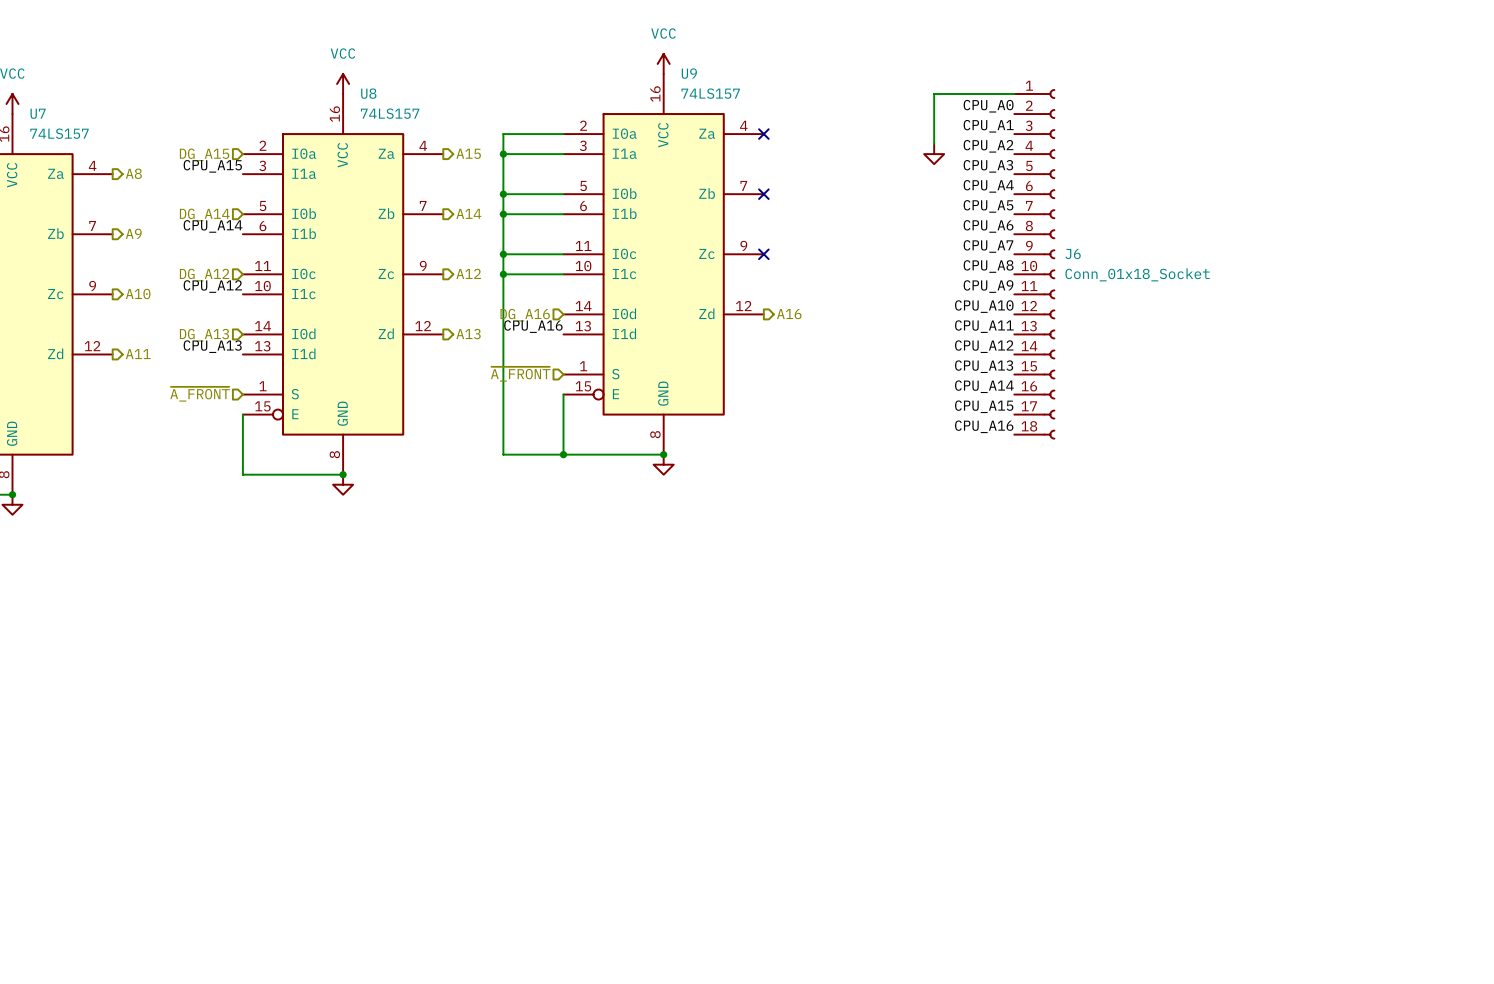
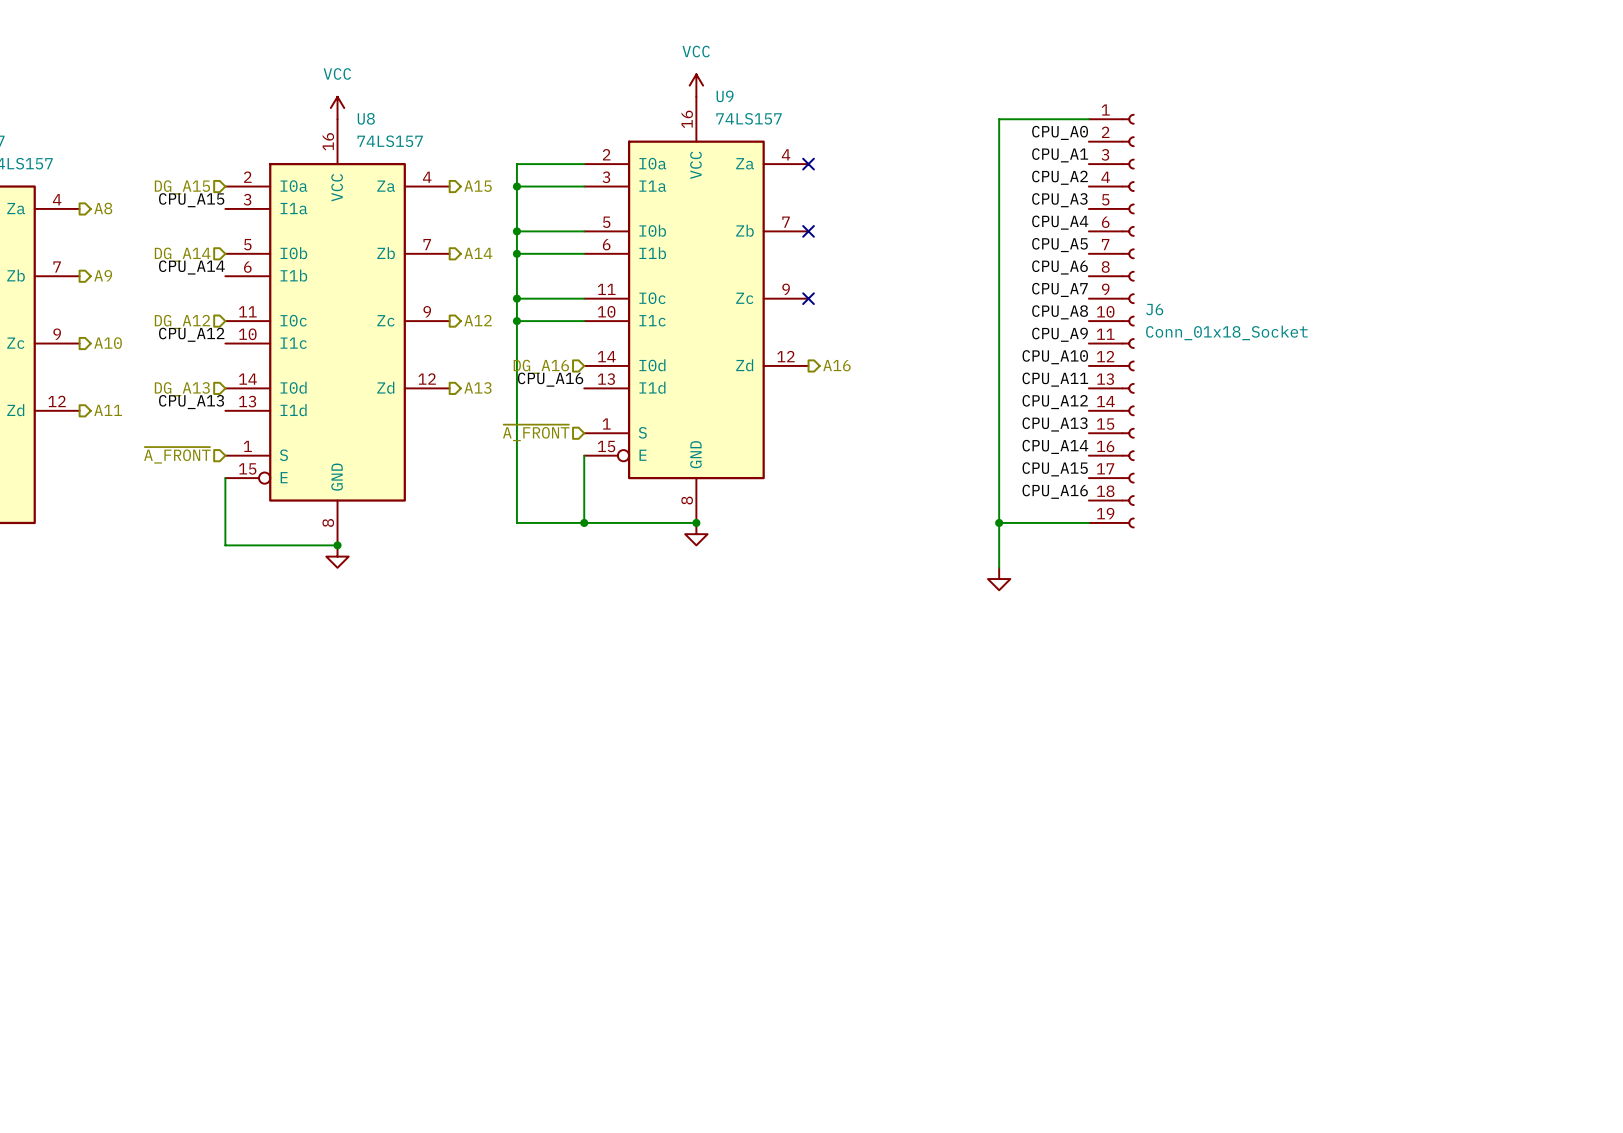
J6 symbol: [1014, 89, 1055, 440] -> [1088, 114, 1135, 529]
wire: none -> (999, 175) (999, 567)
power symbol: (934, 154) -> none
wire: none -> (999, 522) (1088, 522)
junction: none -> (999, 522)
power symbol: none -> (999, 579)

